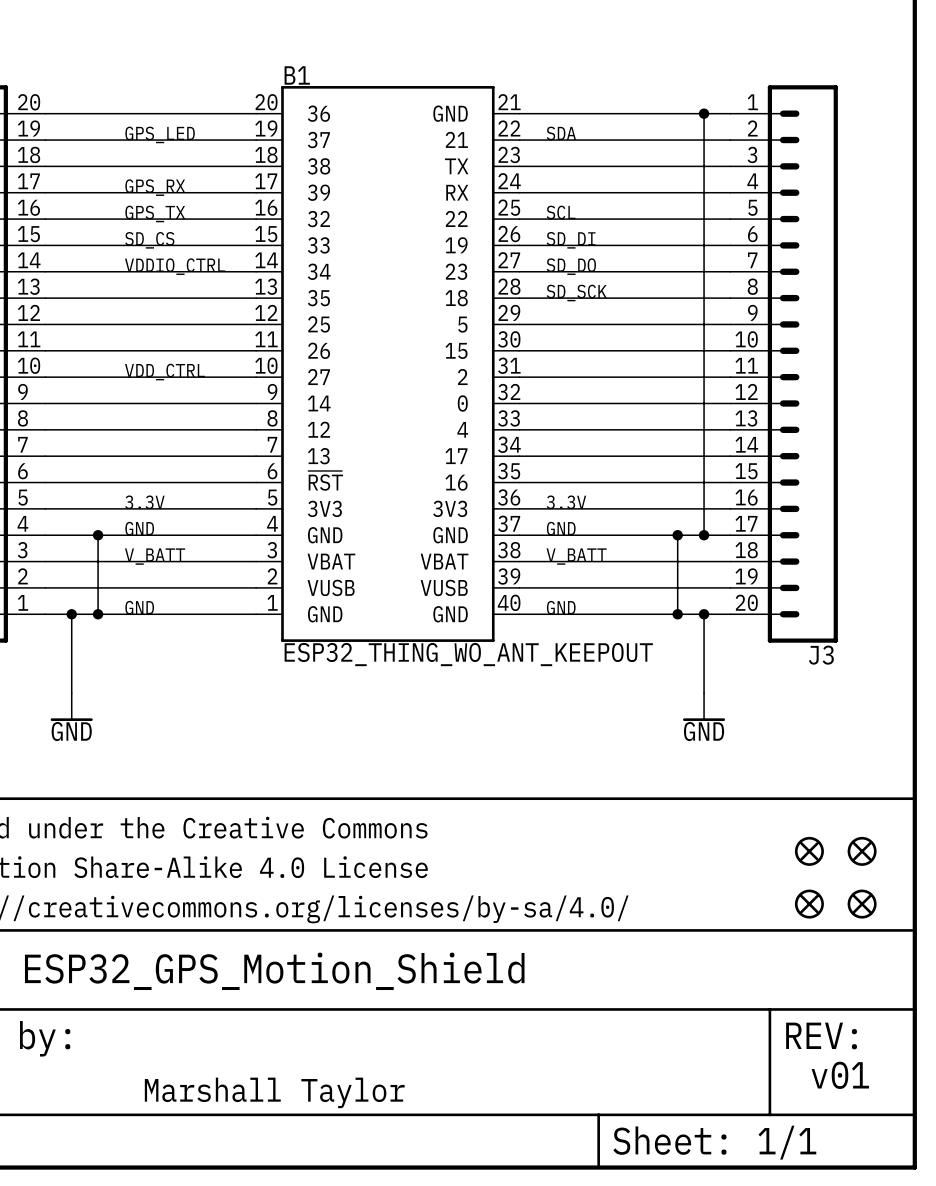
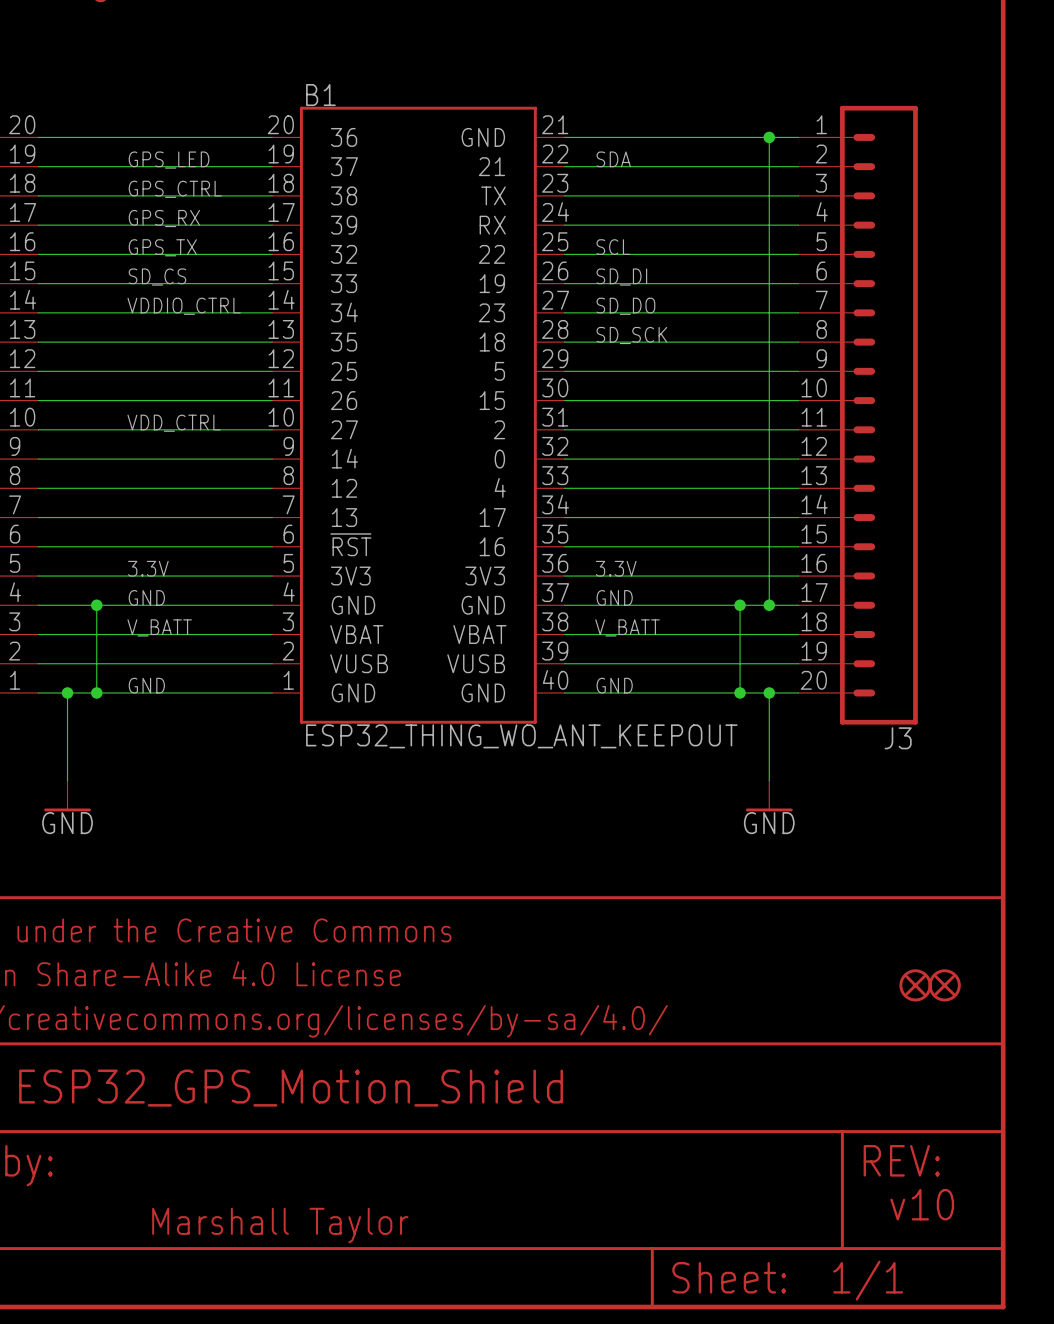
label: none -> GPS_CTRL (175, 189)
part: (809, 851) -> none
part: (862, 851) -> none
part: none -> (915, 985)
part: none -> (944, 985)
part: (809, 904) -> none
part: (862, 904) -> none
text: v01 (840, 1075) -> v10 (922, 1204)

